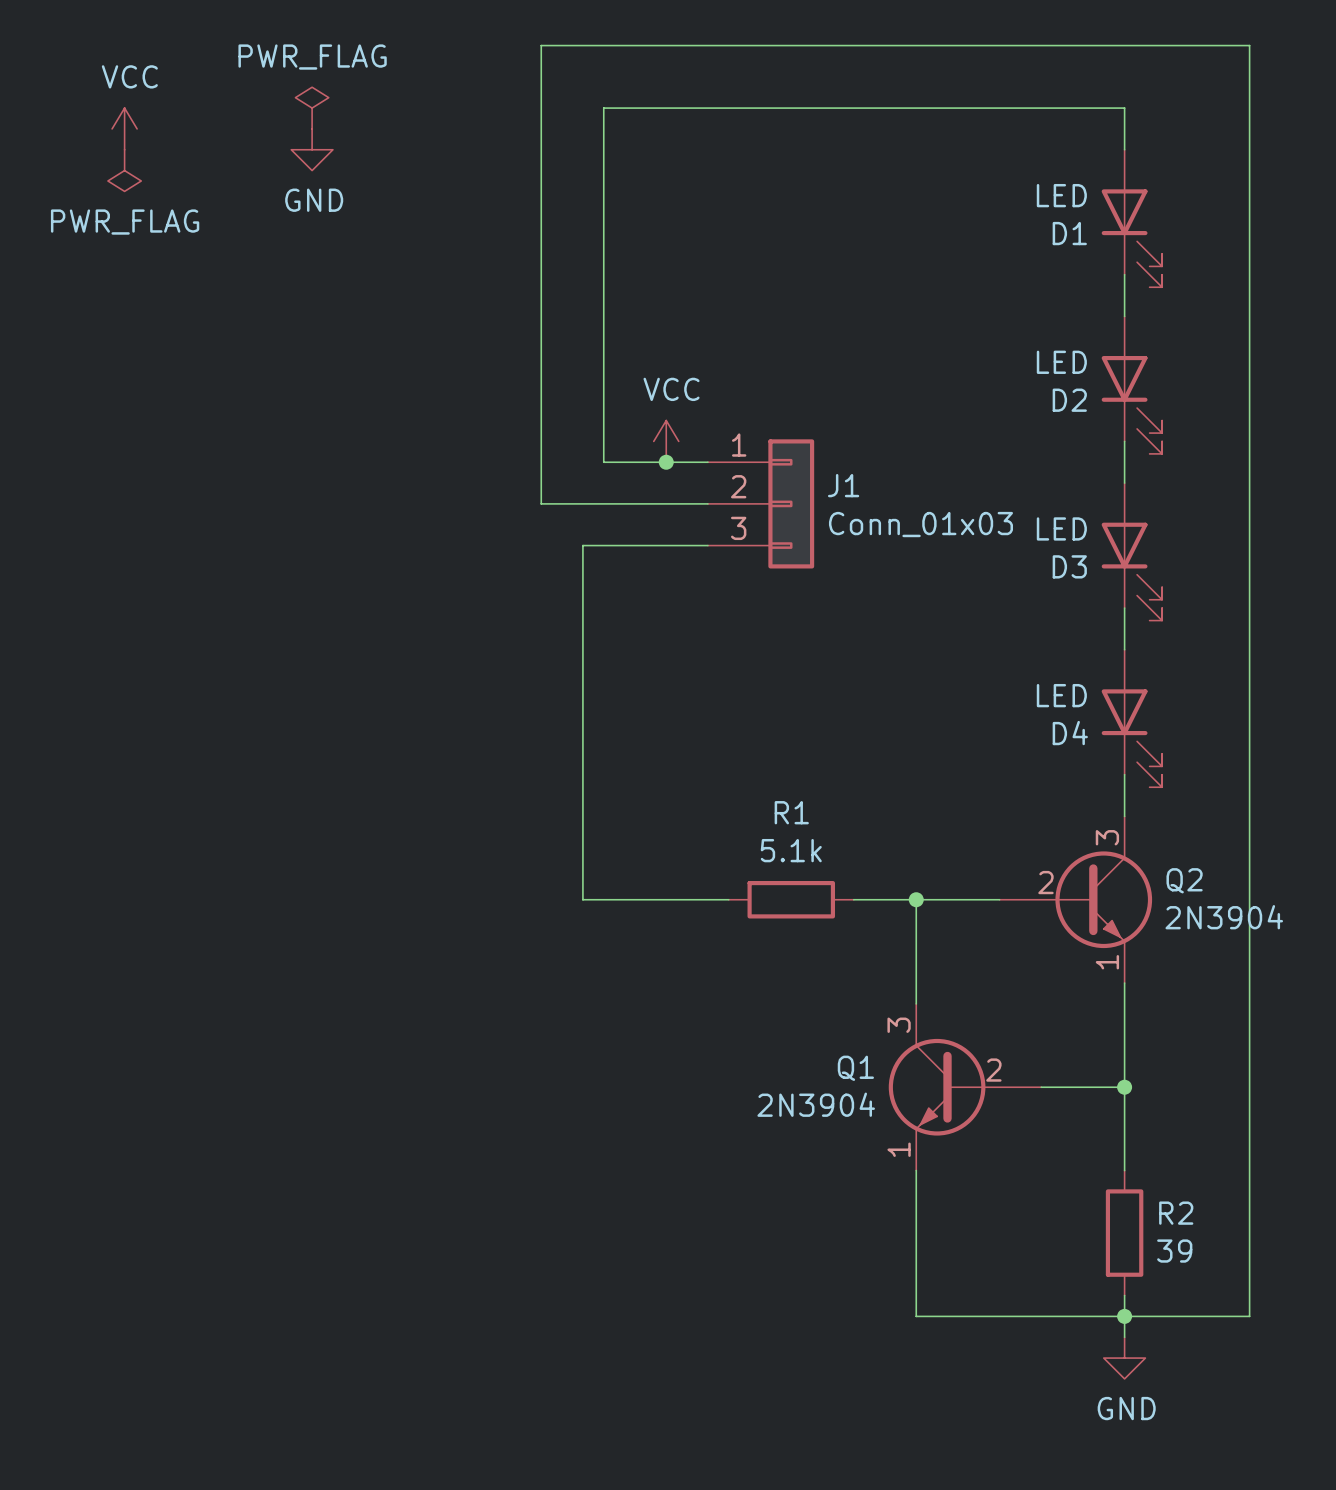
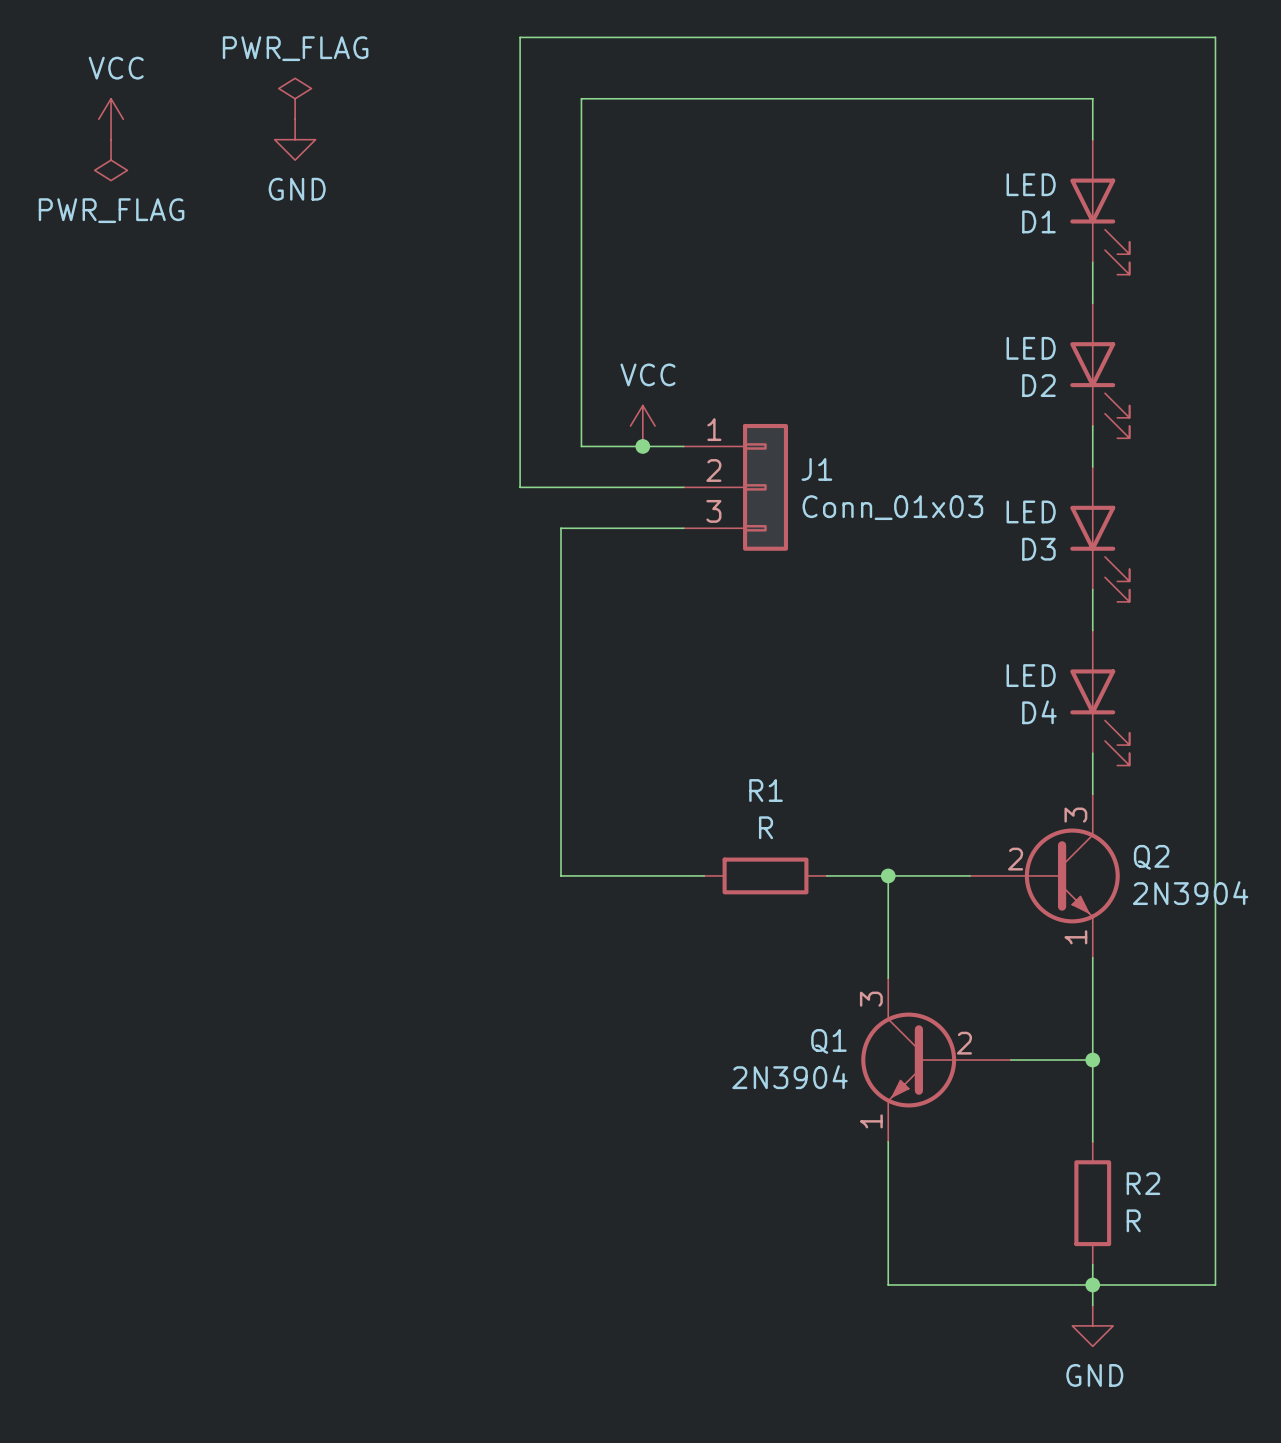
R1 value: 5.1k (791, 850) -> R (766, 827)
R2 value: 39 (1174, 1251) -> R (1133, 1220)

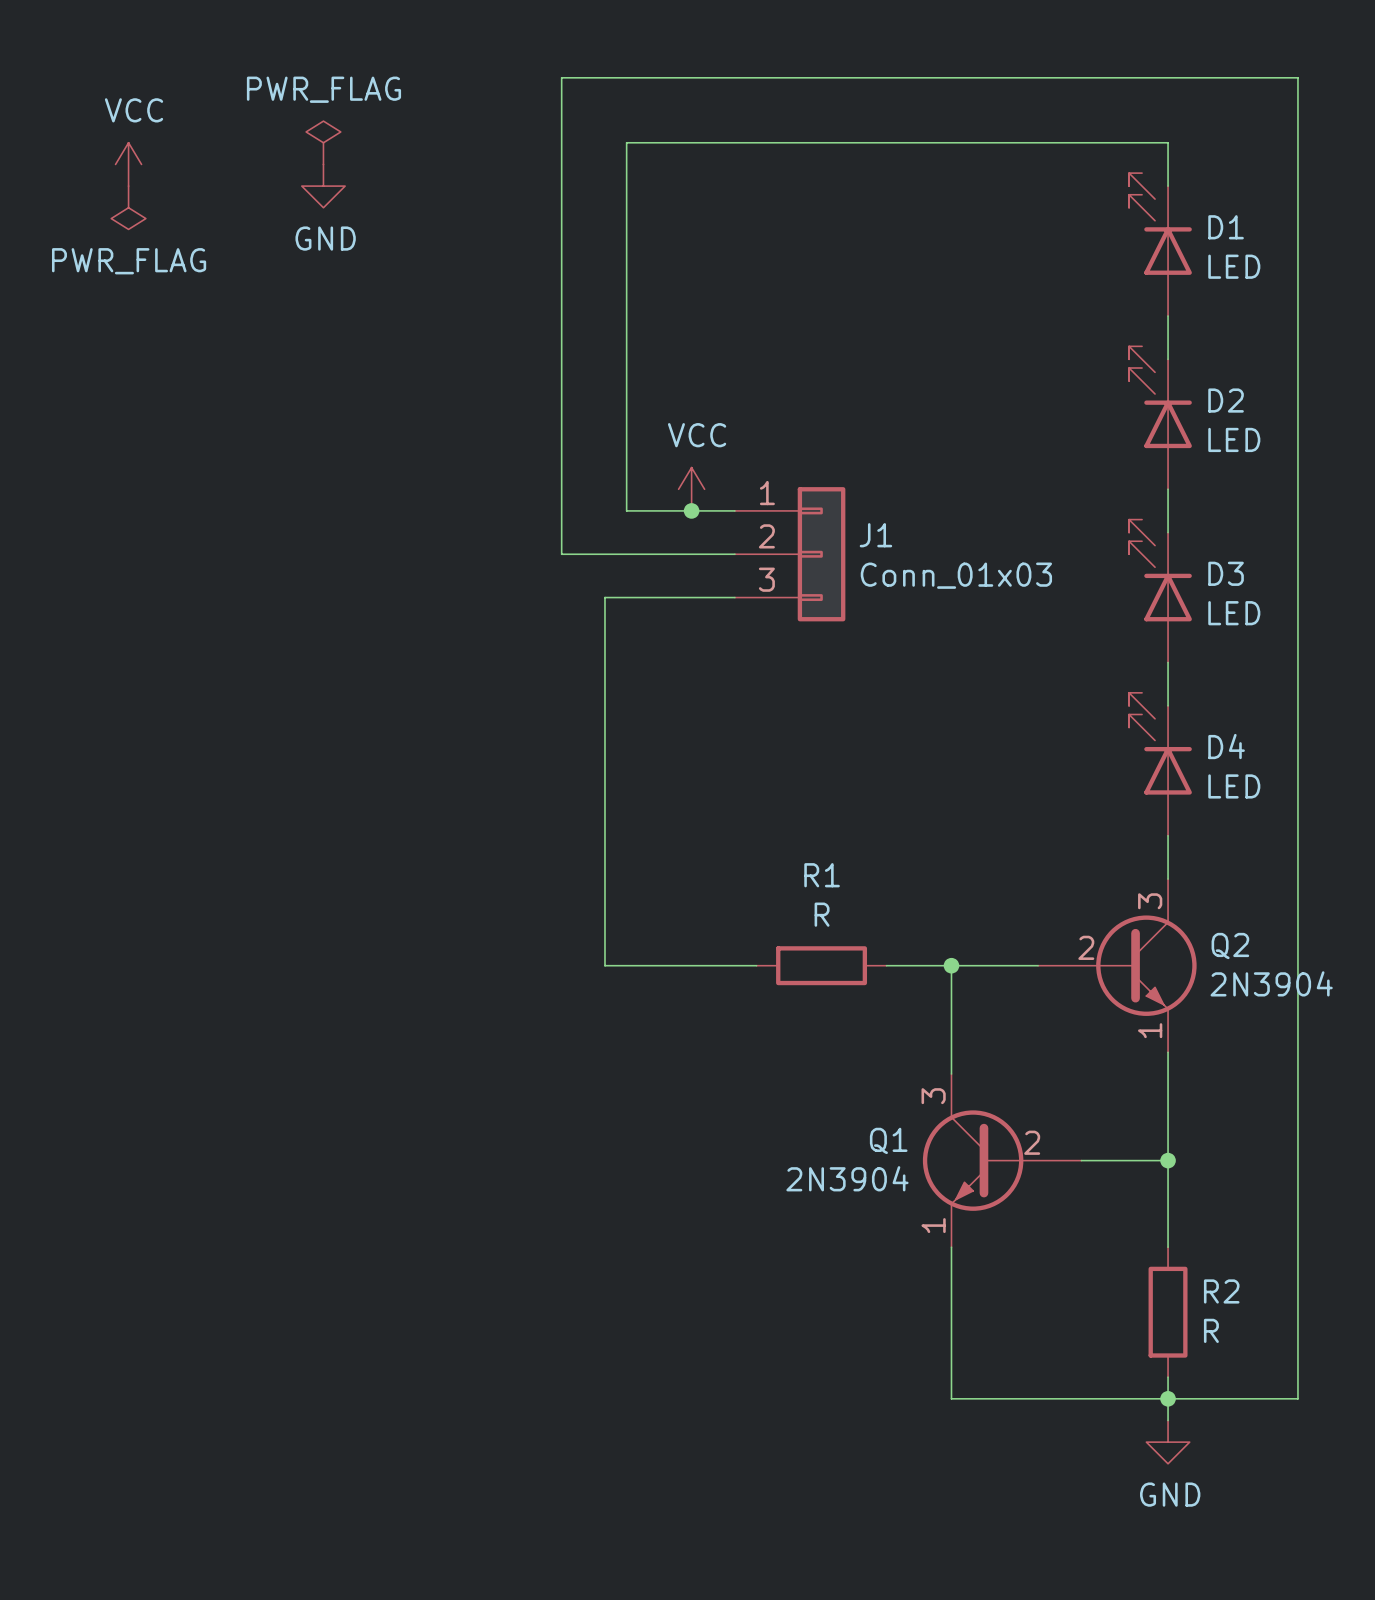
D1 rotation: 0° (1099, 226) -> 180° (1160, 223)
D2 rotation: 0° (1099, 390) -> 180° (1160, 397)
D3 rotation: 0° (1099, 553) -> 180° (1160, 570)
D4 rotation: 0° (1099, 717) -> 180° (1160, 743)

